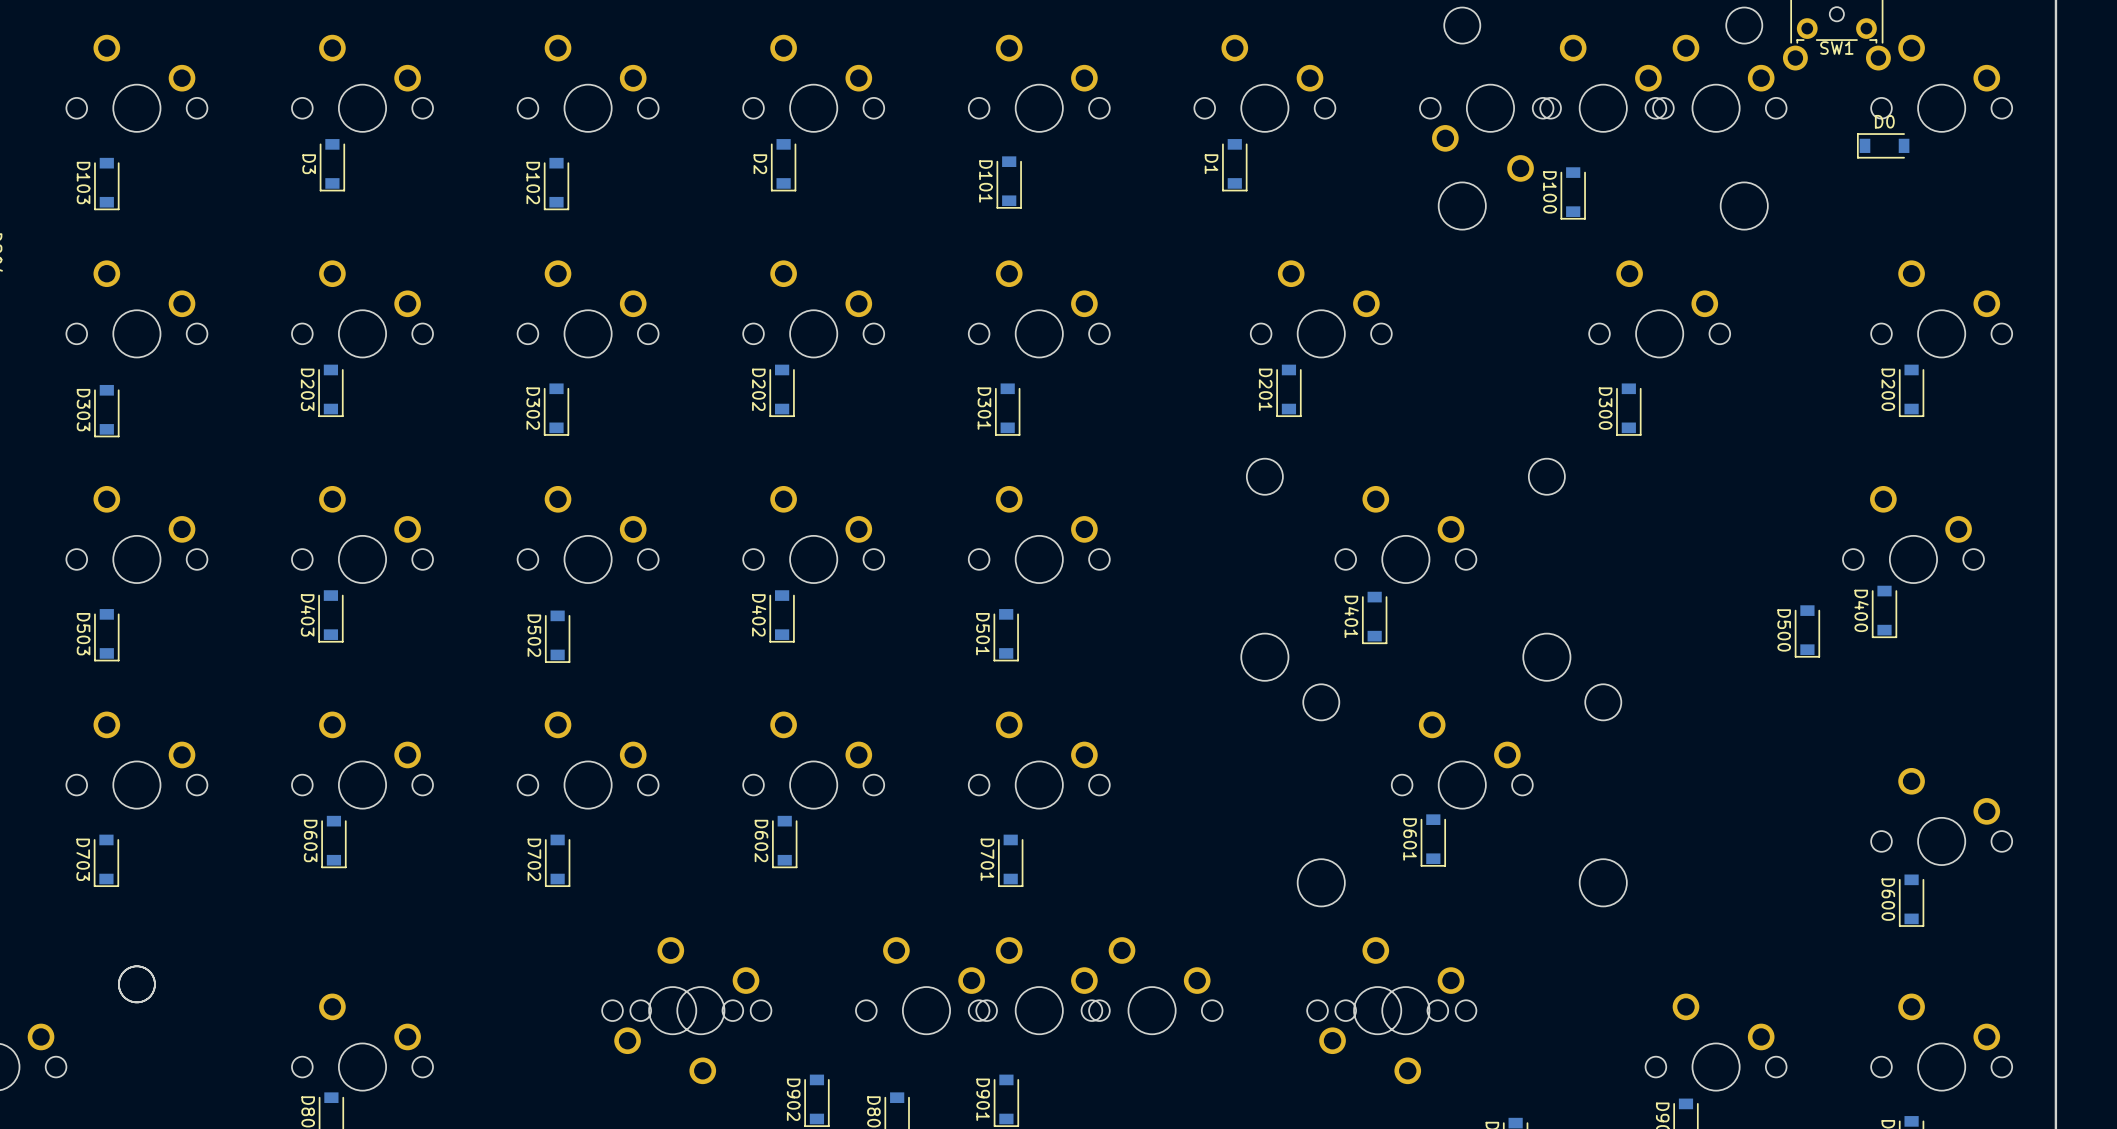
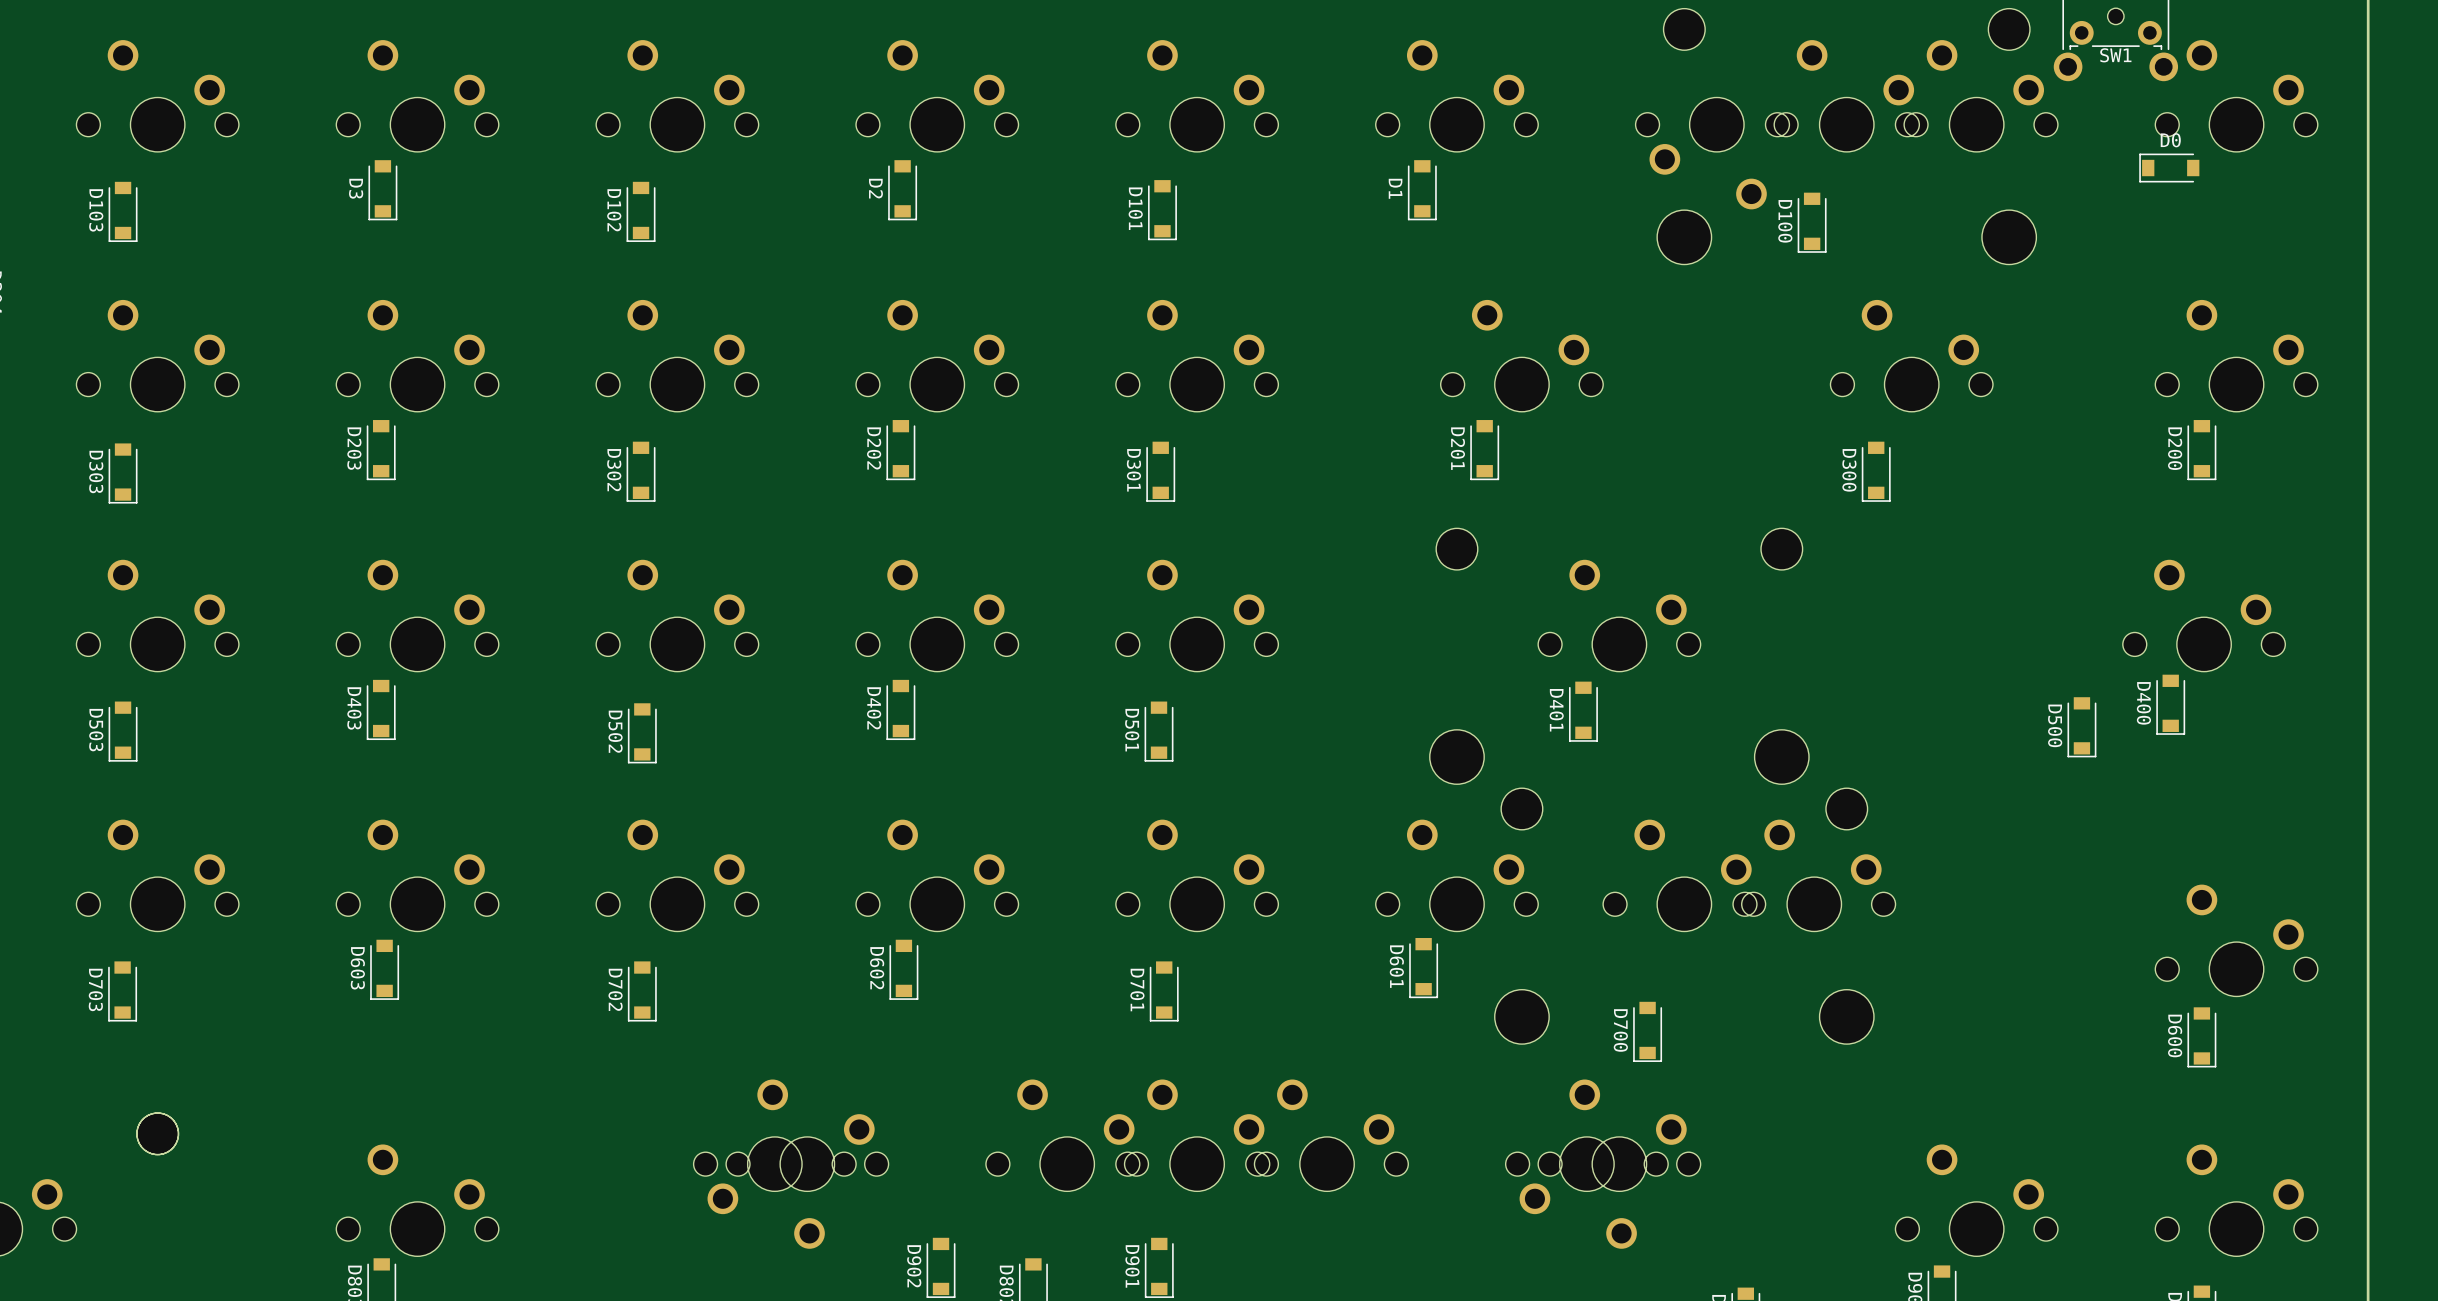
part: none -> (1456, 875)
part: none -> (1814, 875)
D601 position: (1433, 840) -> (1423, 968)
D700: none -> (1647, 1031)

